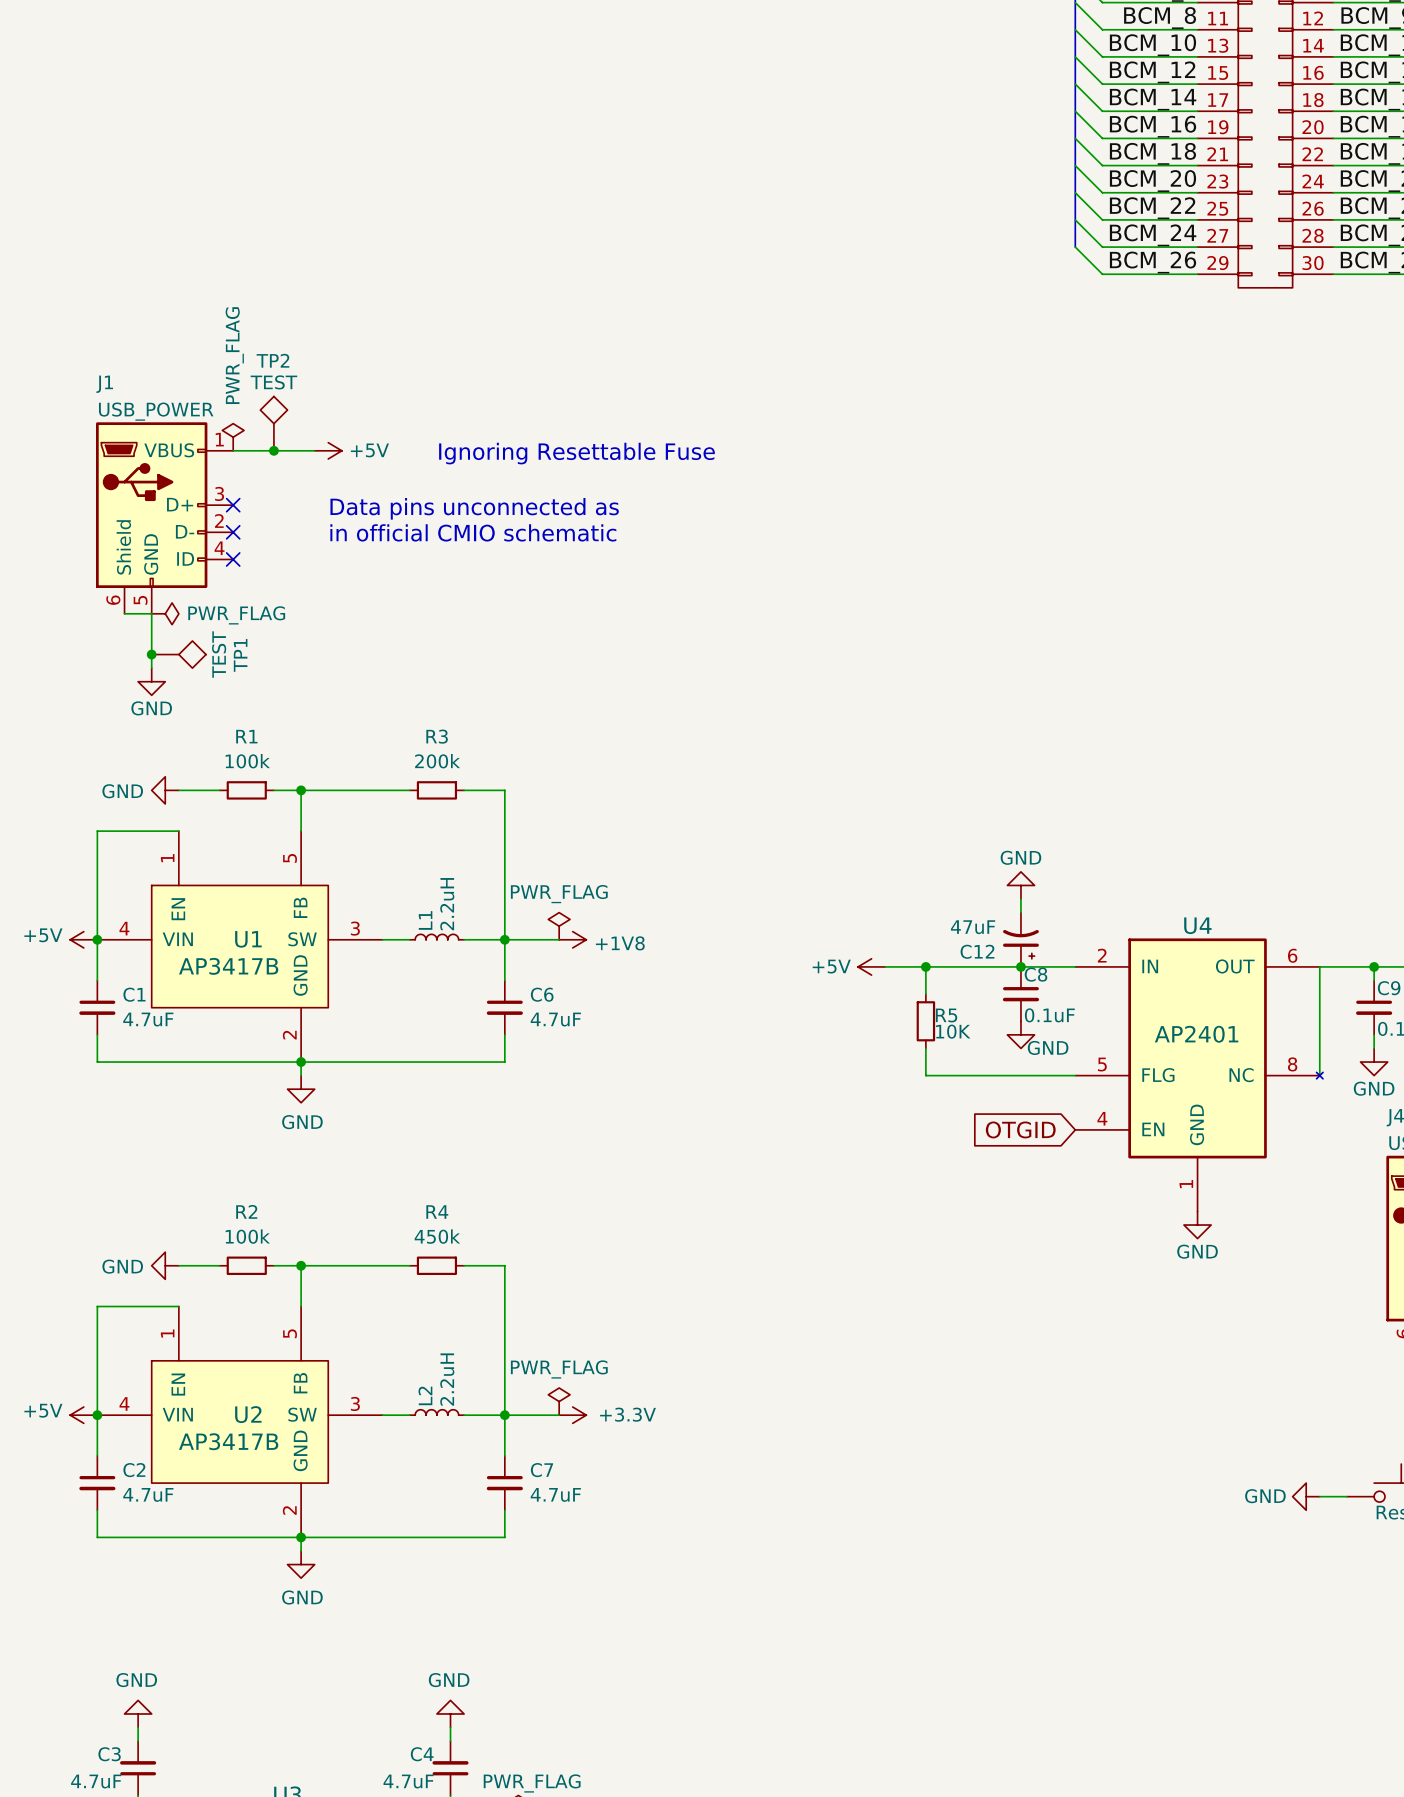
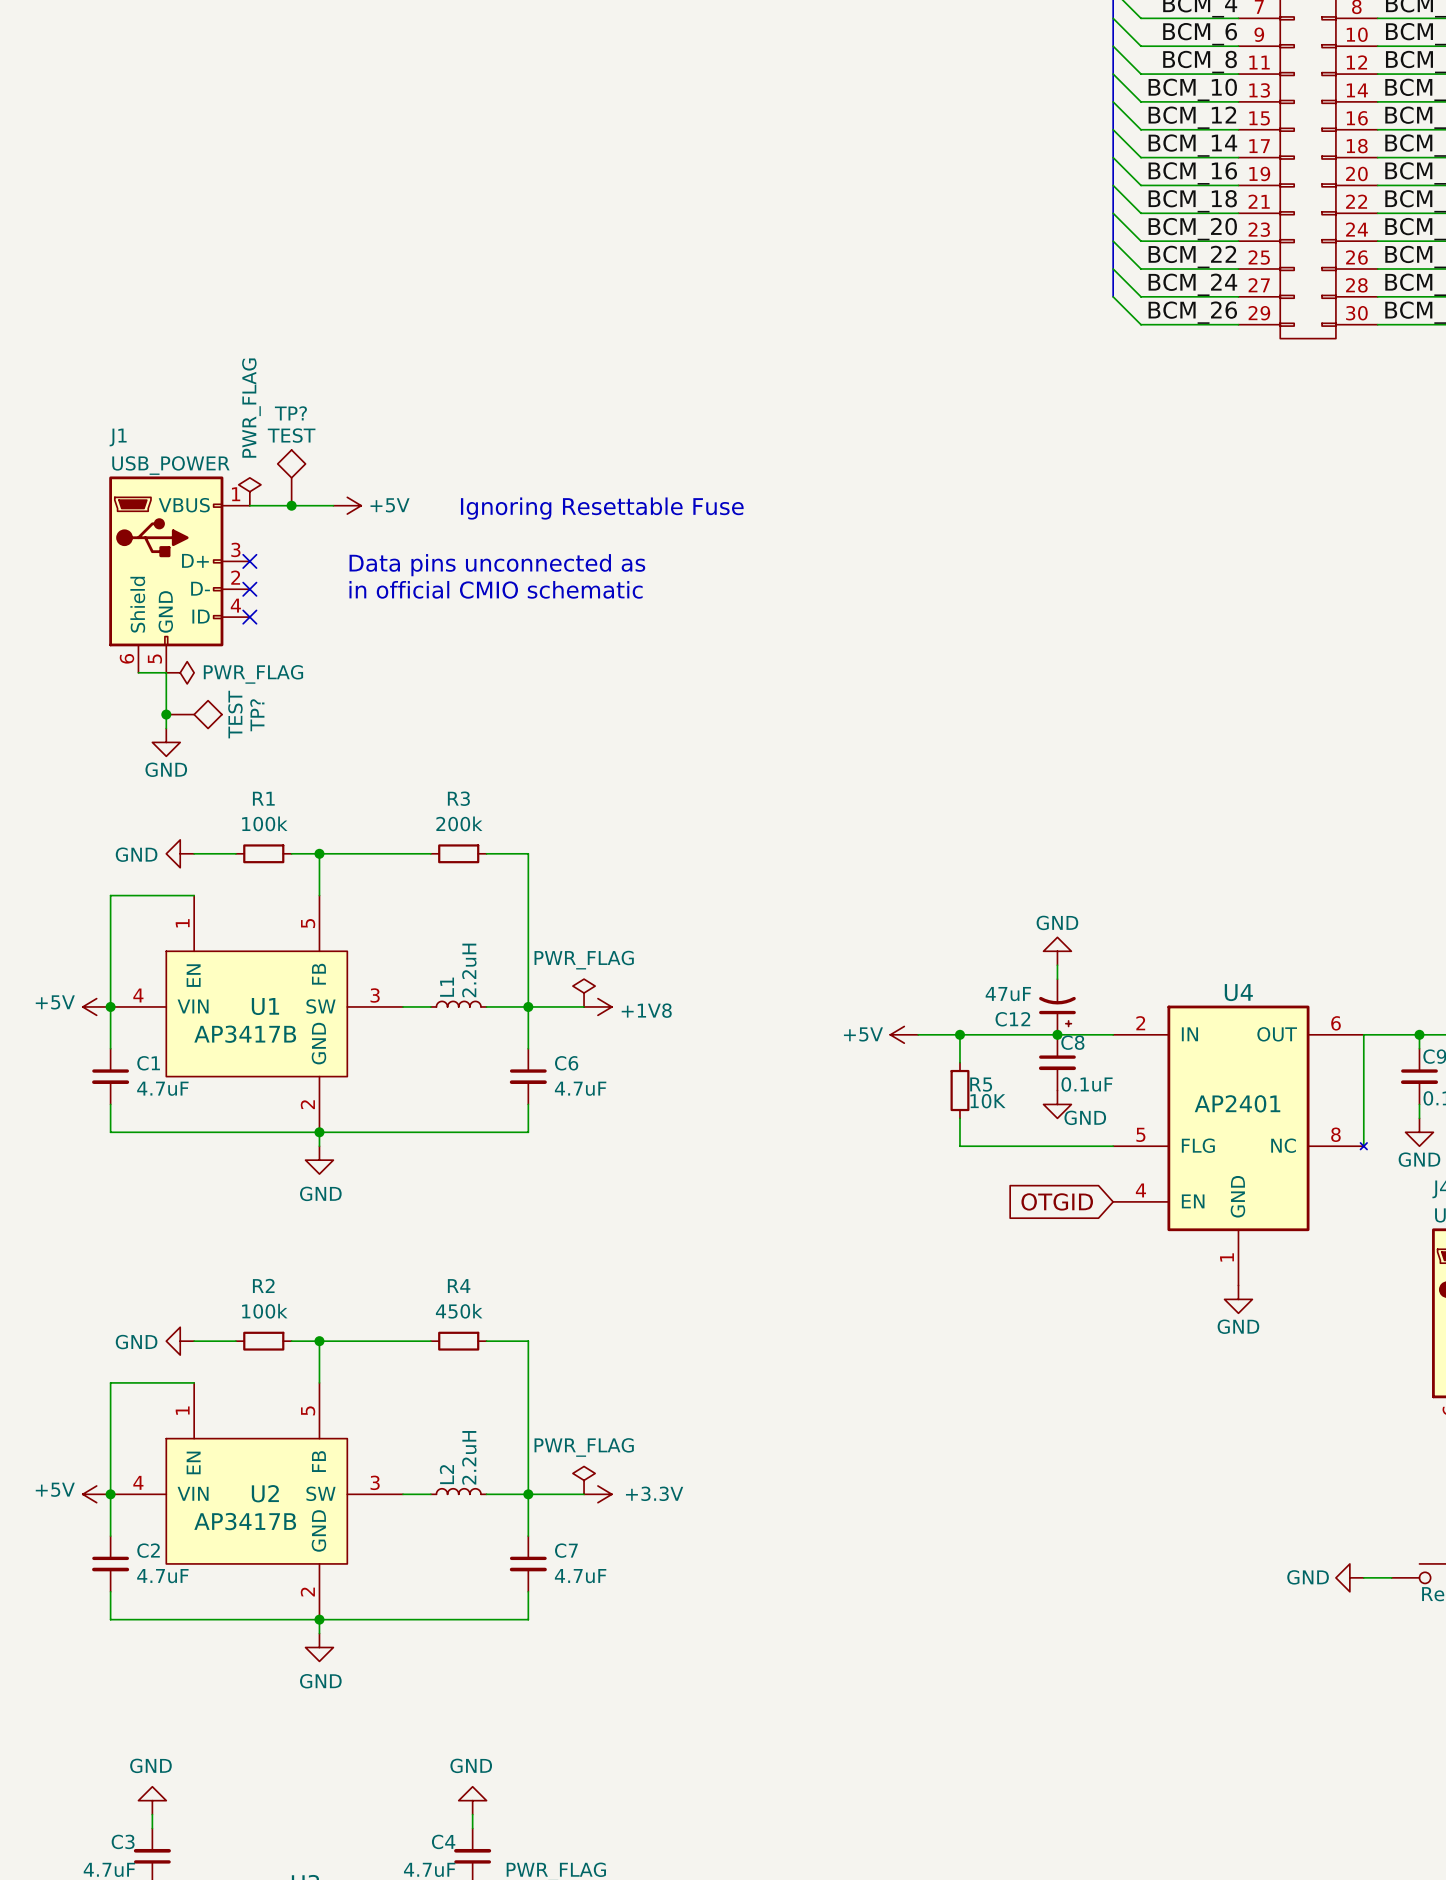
TP2 name: TP2 (272, 360) -> TP? (290, 413)
TP1 name: TP1 (240, 655) -> TP? (257, 715)

